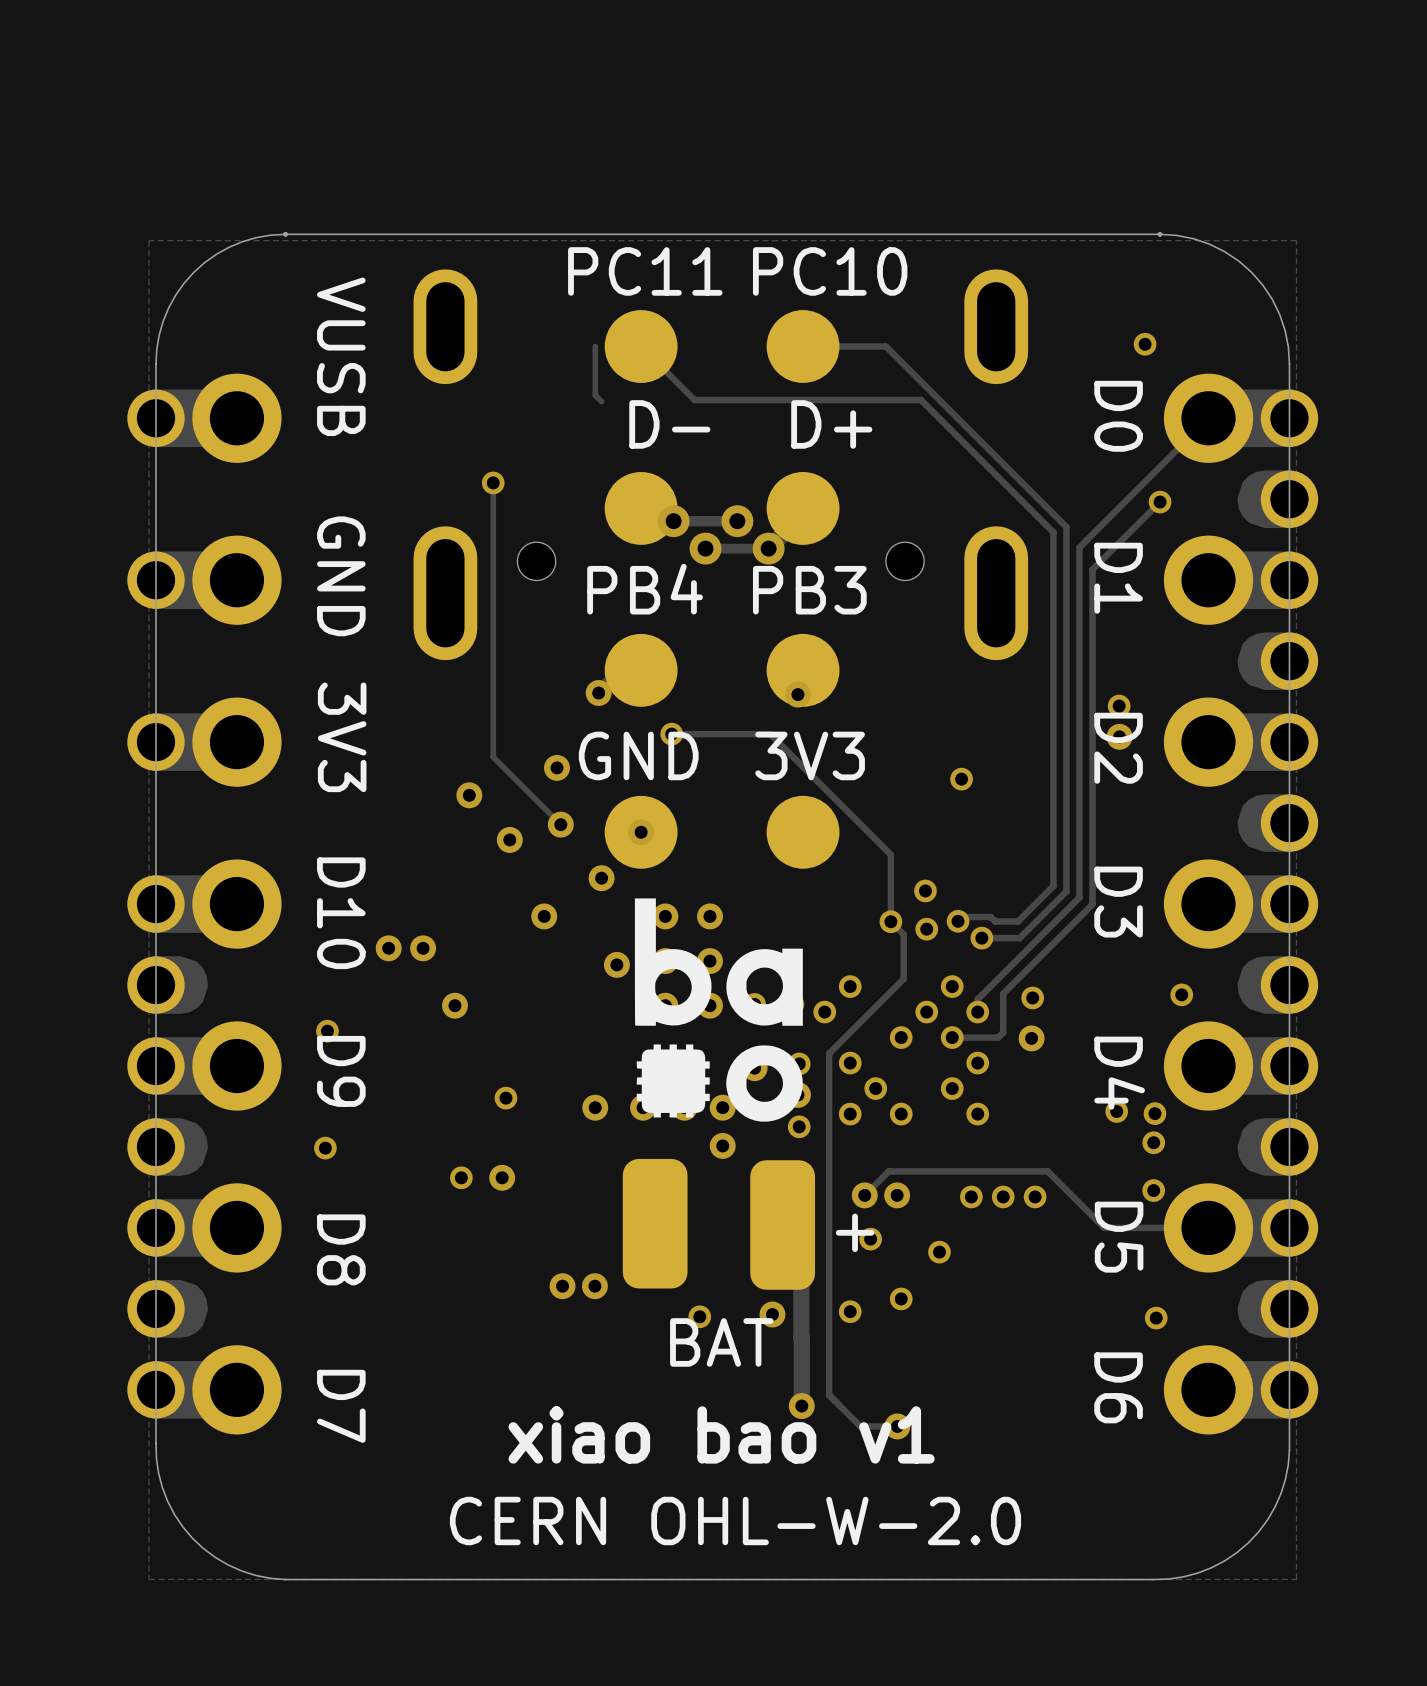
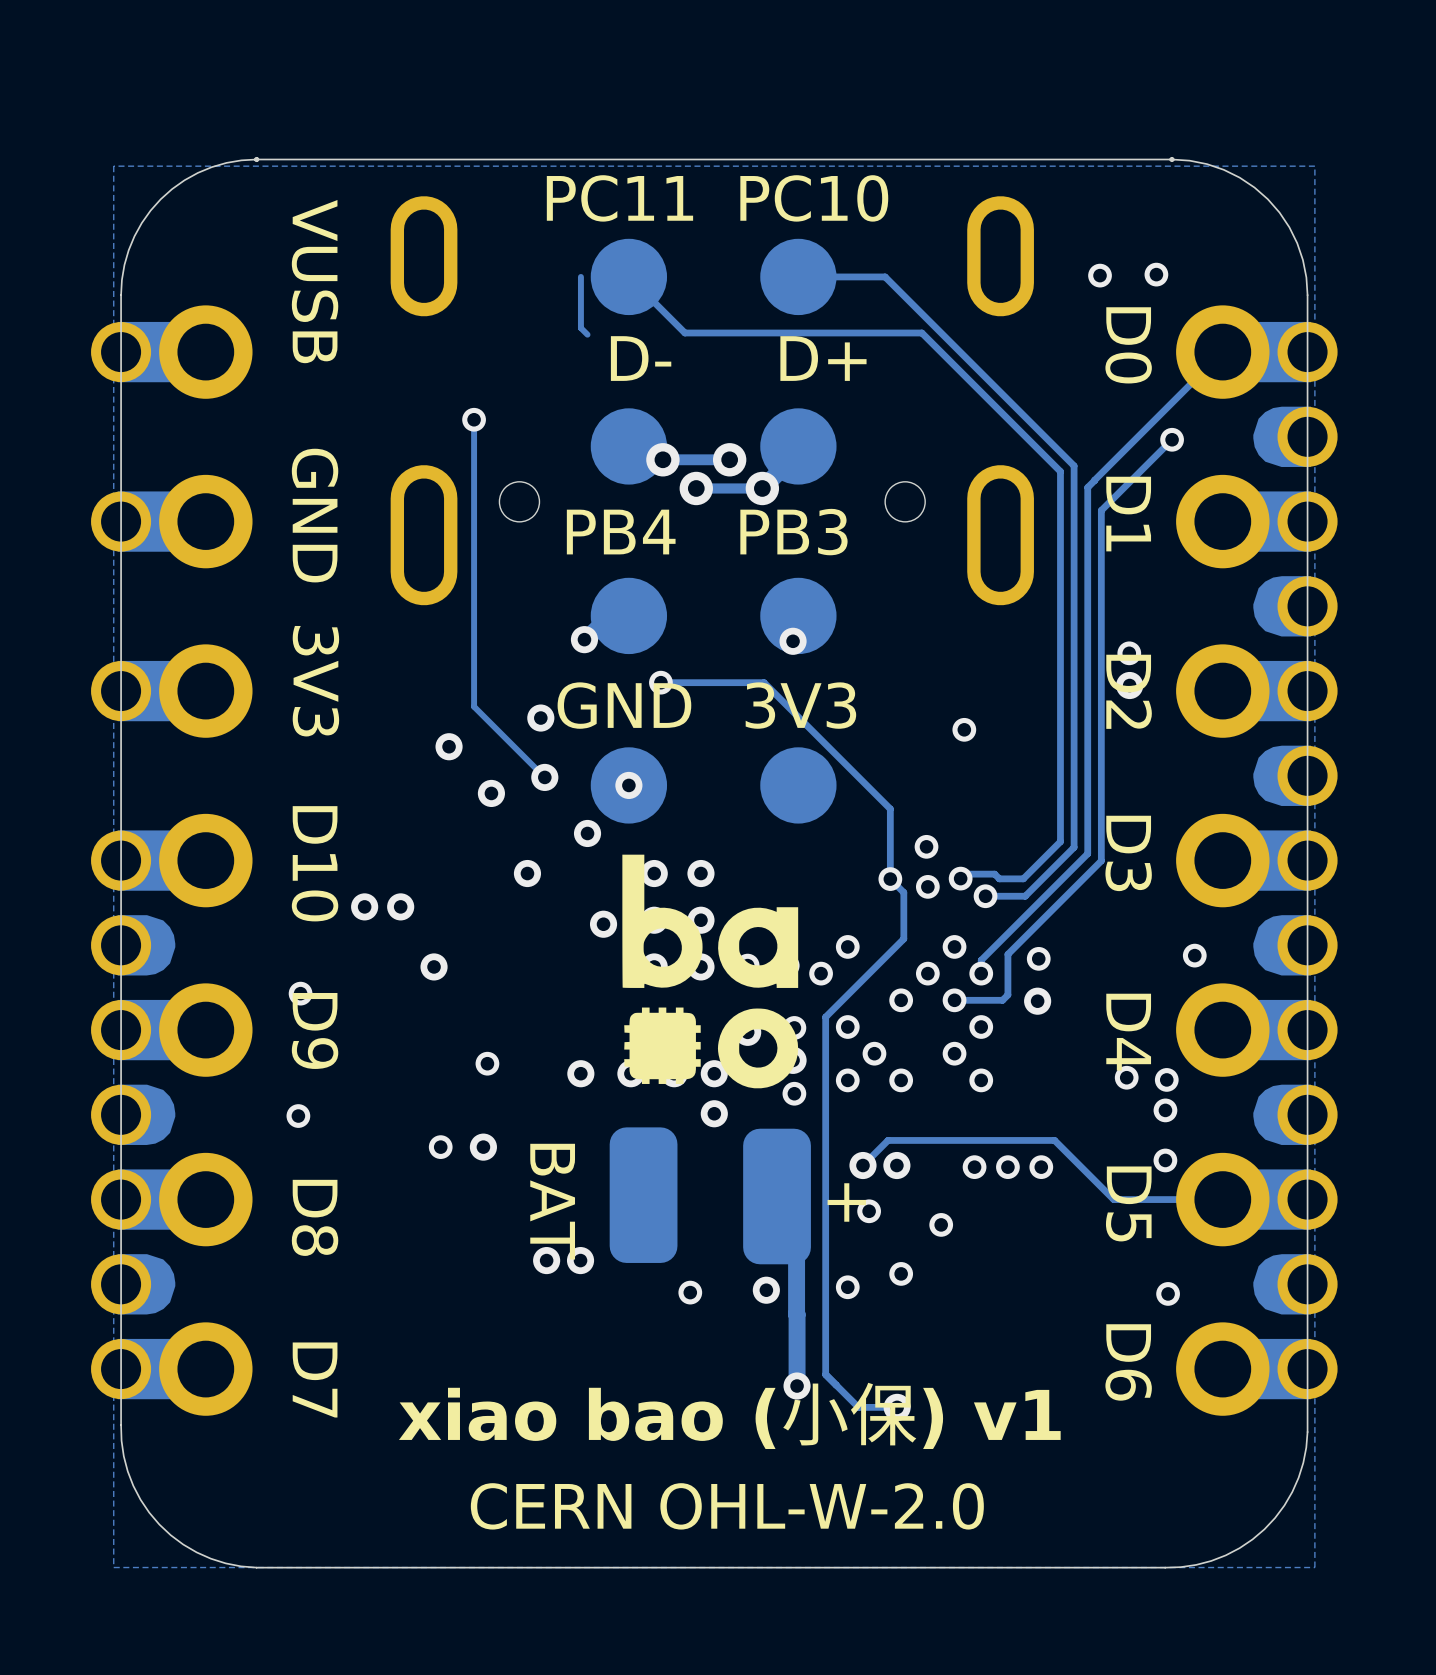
via: none -> (1100, 275)
text rotation: 0° (721, 1342) -> 90° clockwise (552, 1201)
text position: BAT (721, 1342) -> BAT (552, 1201)
text: xiao bao v1 (721, 1434) -> xiao bao (小保) v1 (729, 1415)

